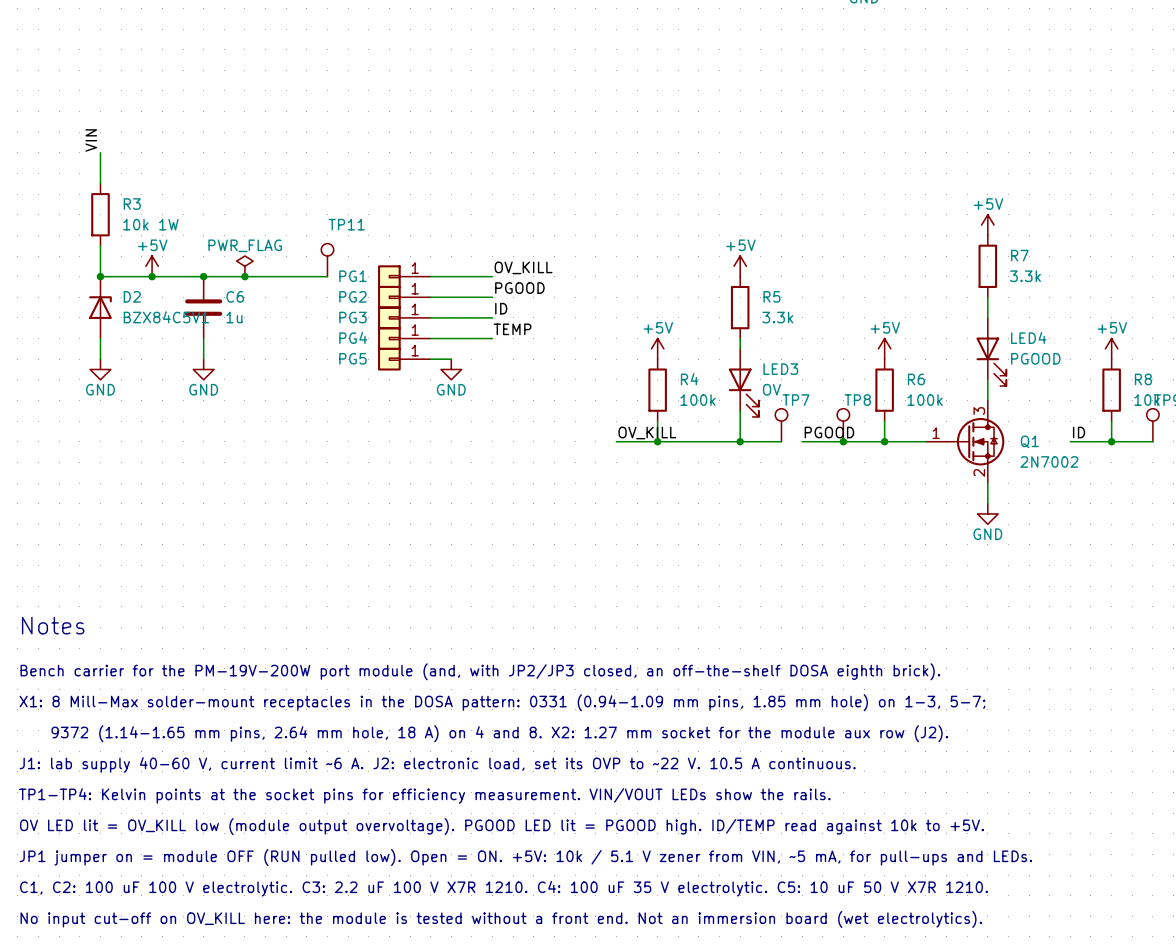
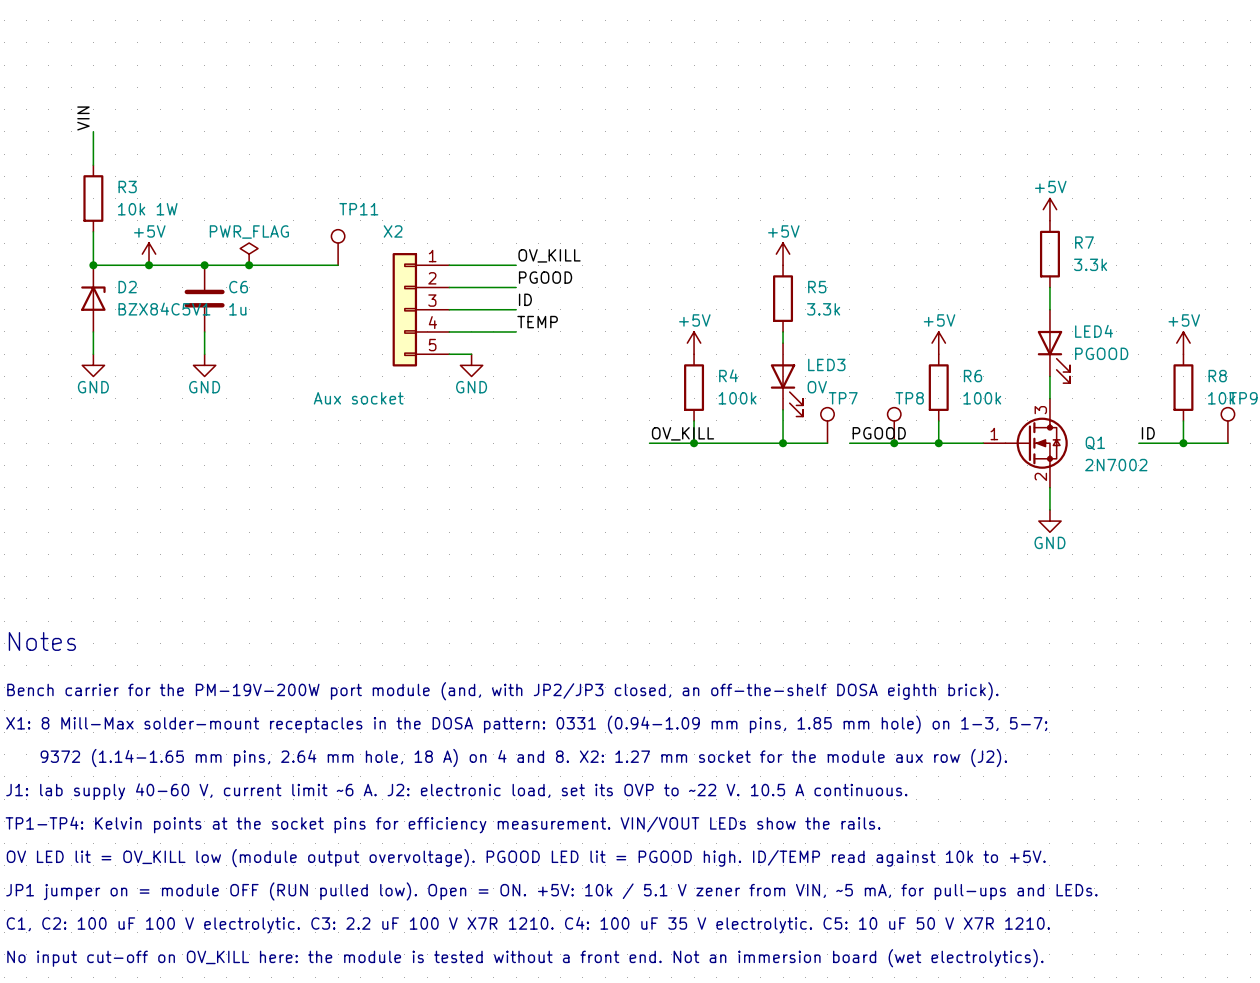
PG1: (404, 276) -> none
PG2: (404, 297) -> none
PG3: (404, 317) -> none
X2: none -> Aux socket (420, 309)
PG4: (404, 338) -> none
PG5: (404, 359) -> none

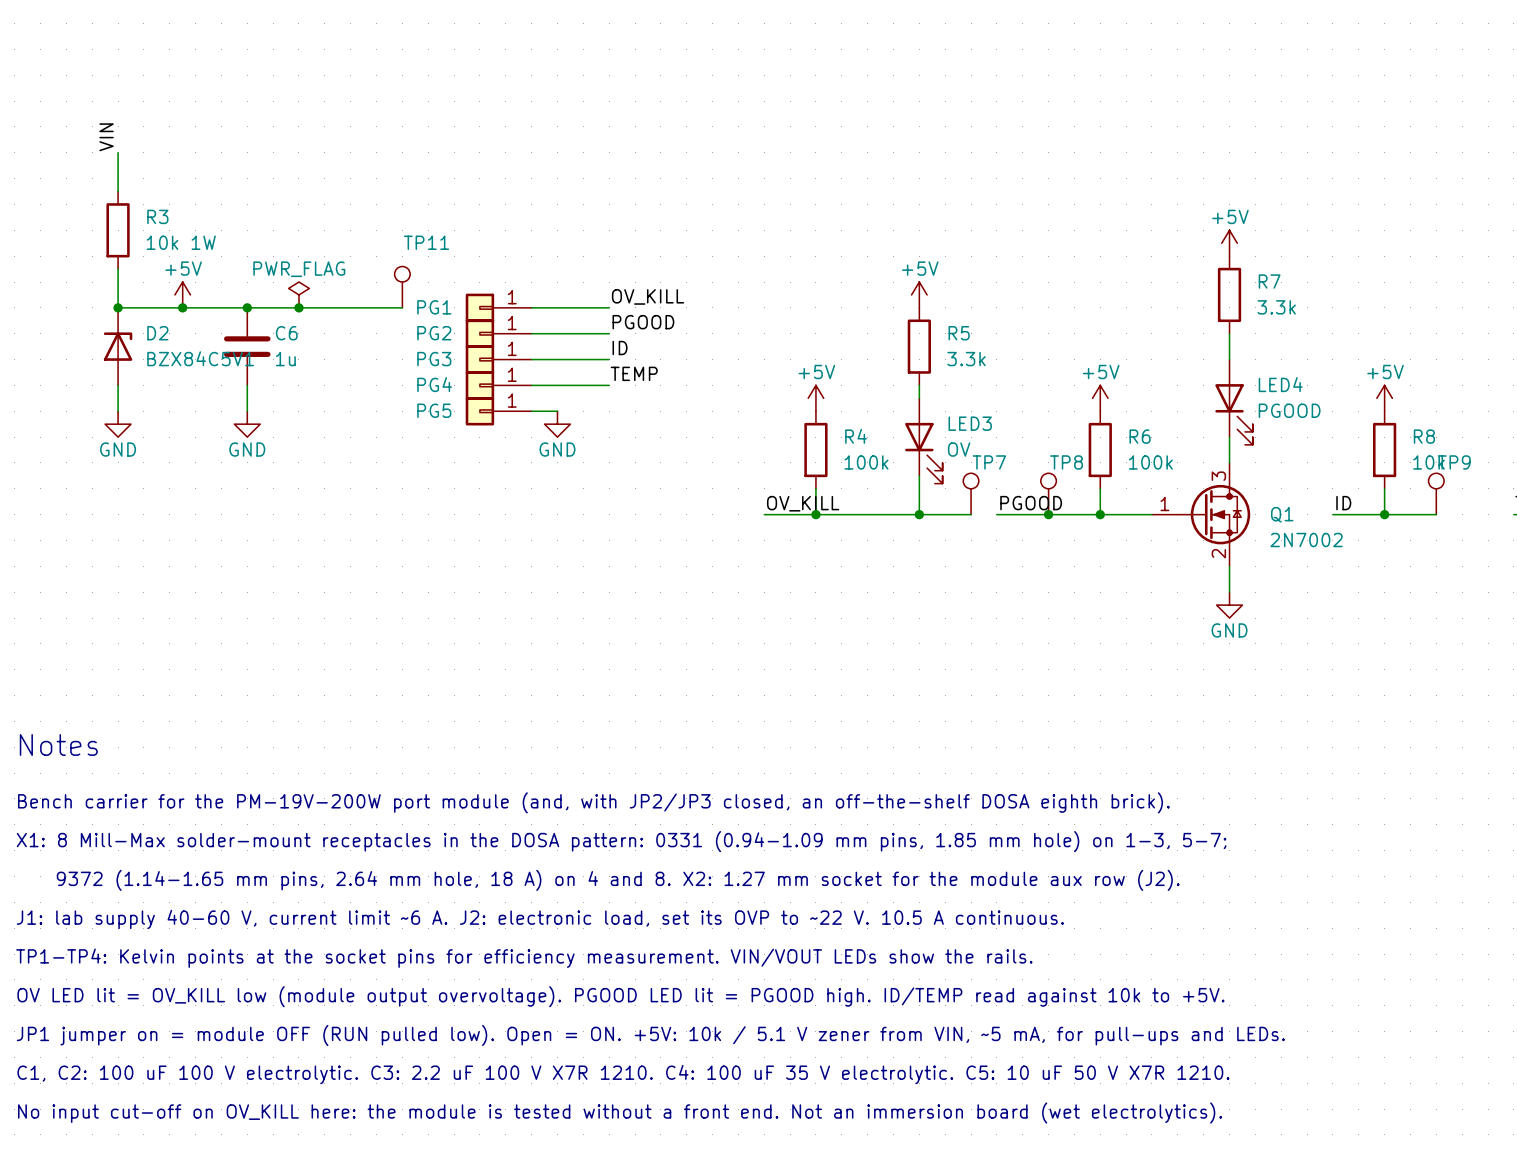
PG1: none -> (498, 307)
PG2: none -> (498, 333)
X2: Aux socket (420, 309) -> none
PG3: none -> (498, 359)
PG4: none -> (498, 385)
PG5: none -> (498, 411)

